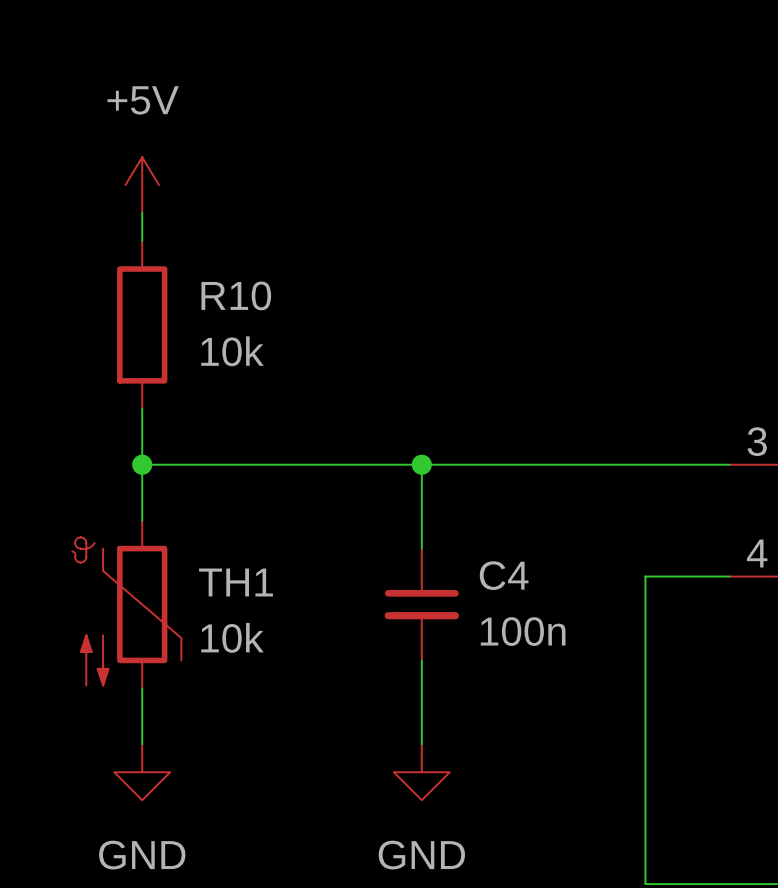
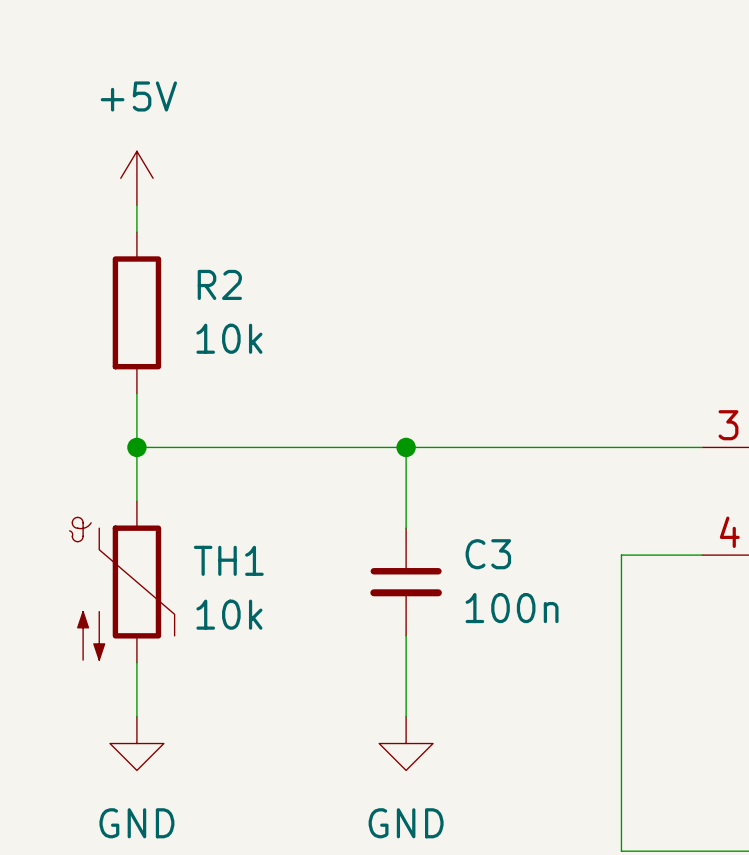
R10 name: R10 (236, 295) -> R2 (219, 284)
C4 name: C4 (504, 575) -> C3 (488, 554)

